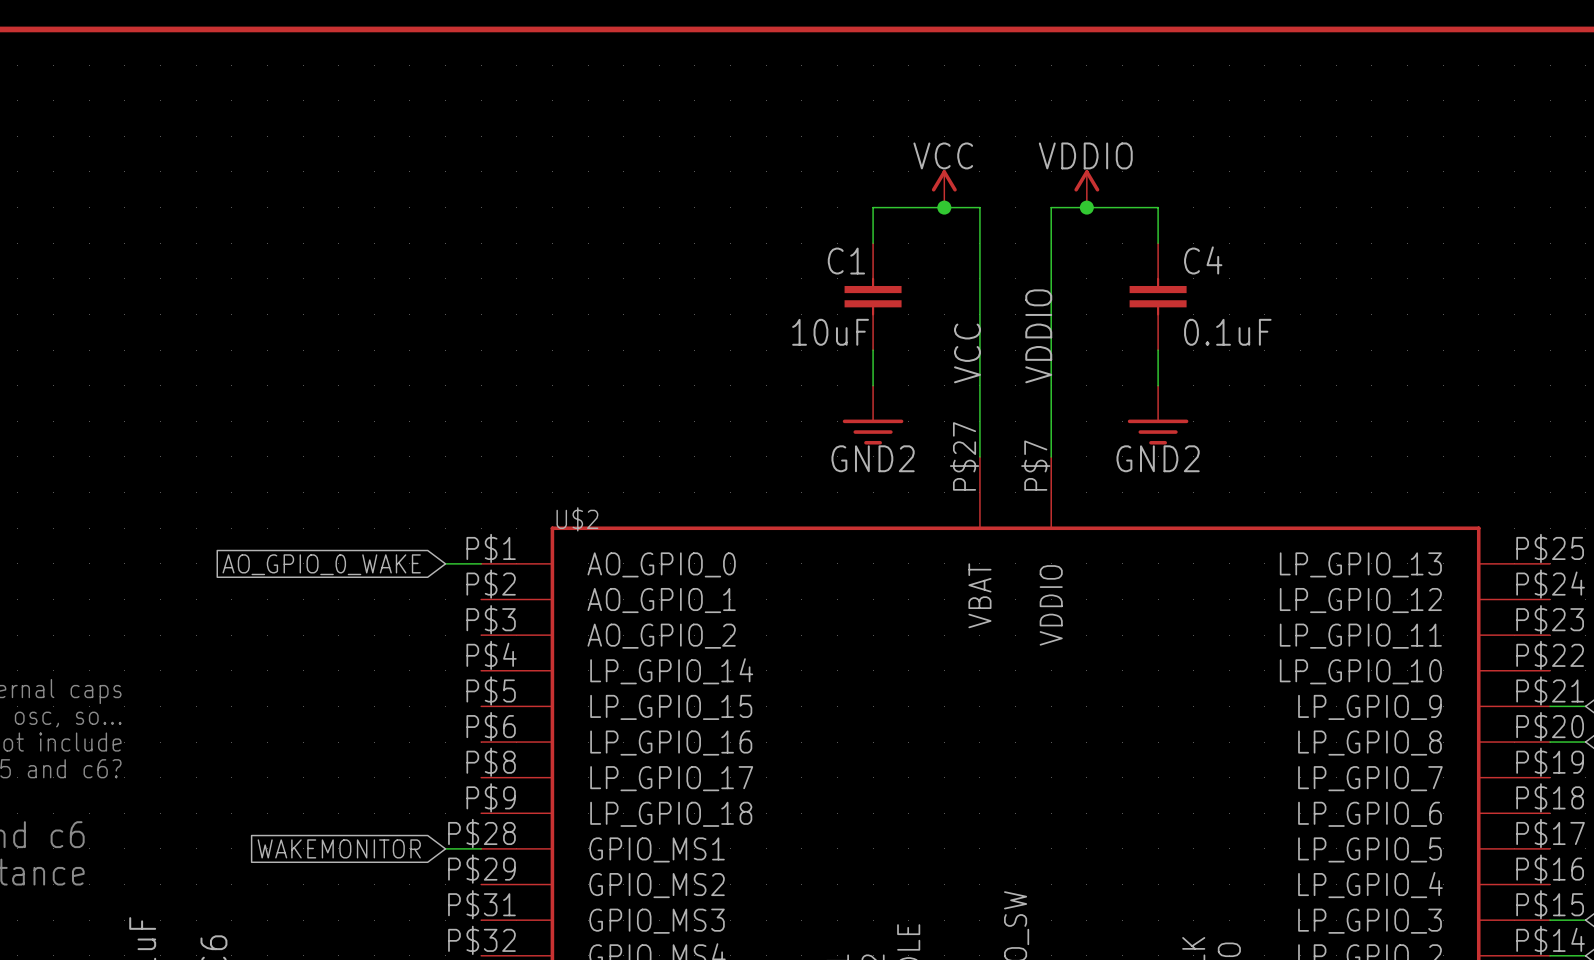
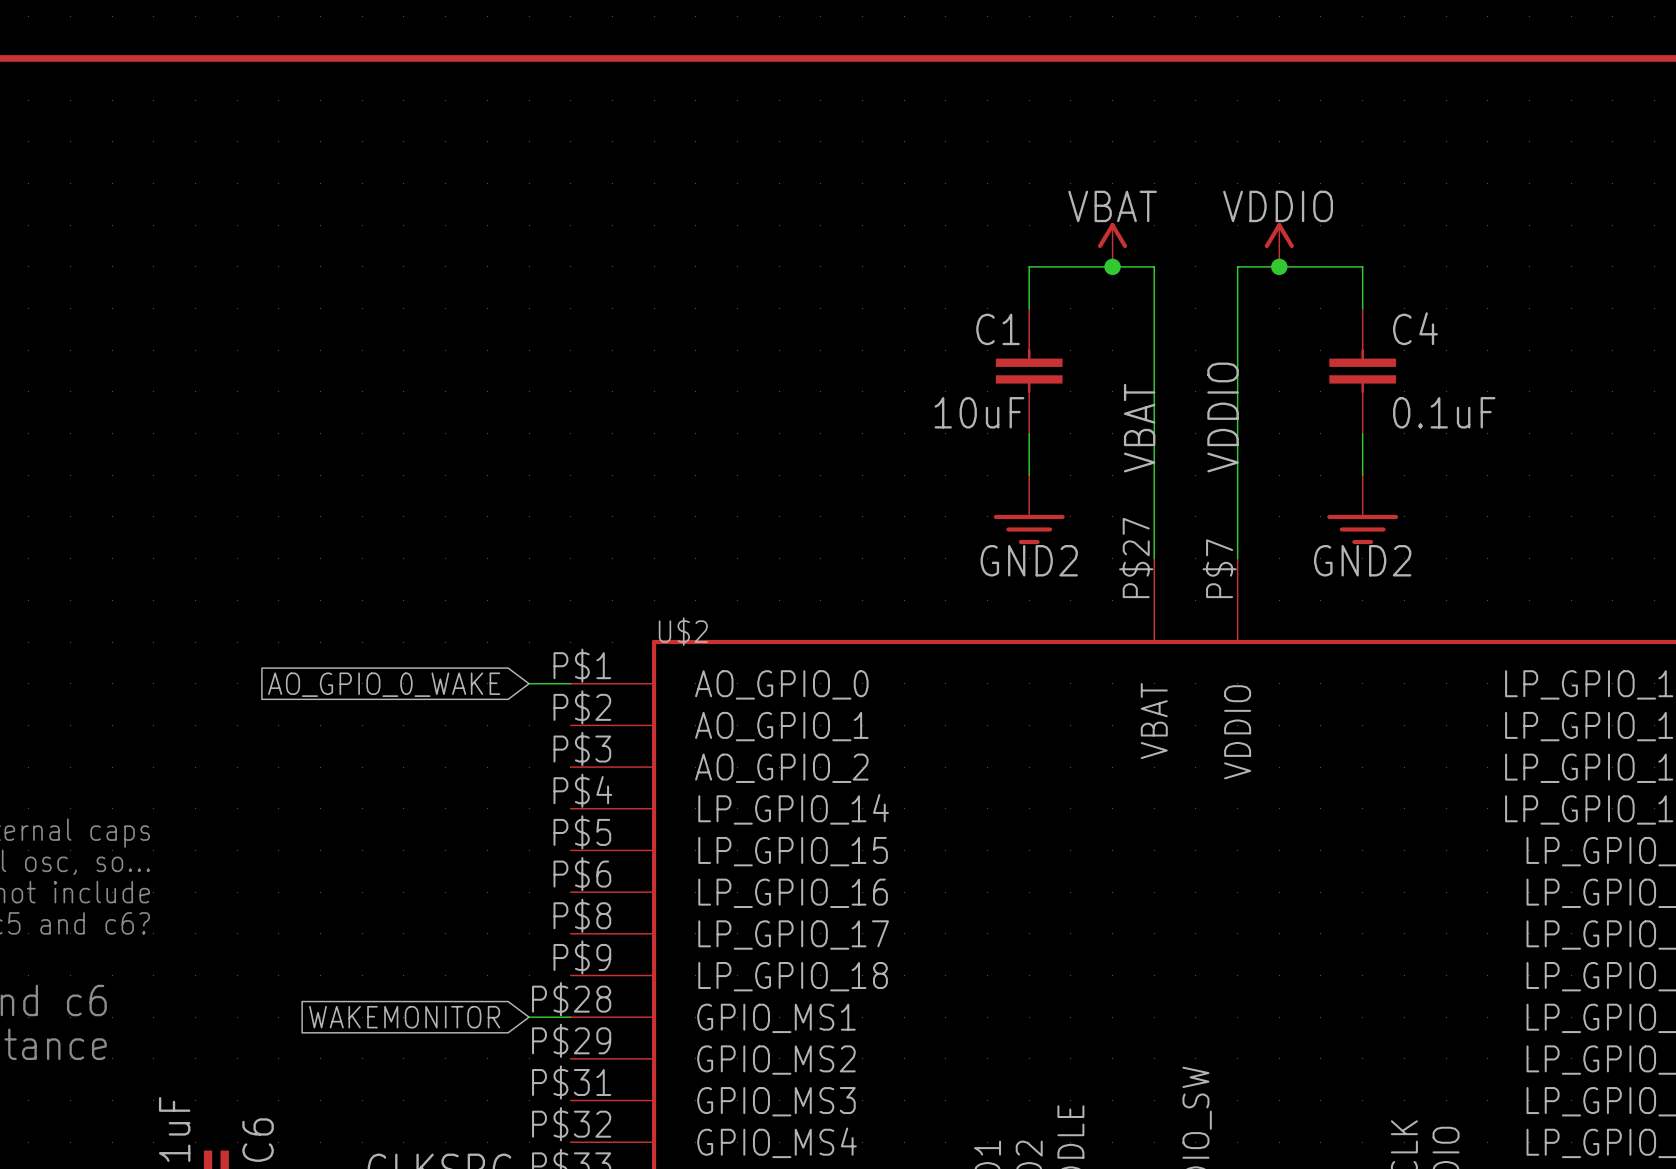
power symbol: VCC (944, 188) -> VBAT (1112, 245)
label: VCC (967, 353) -> VBAT (1139, 428)

